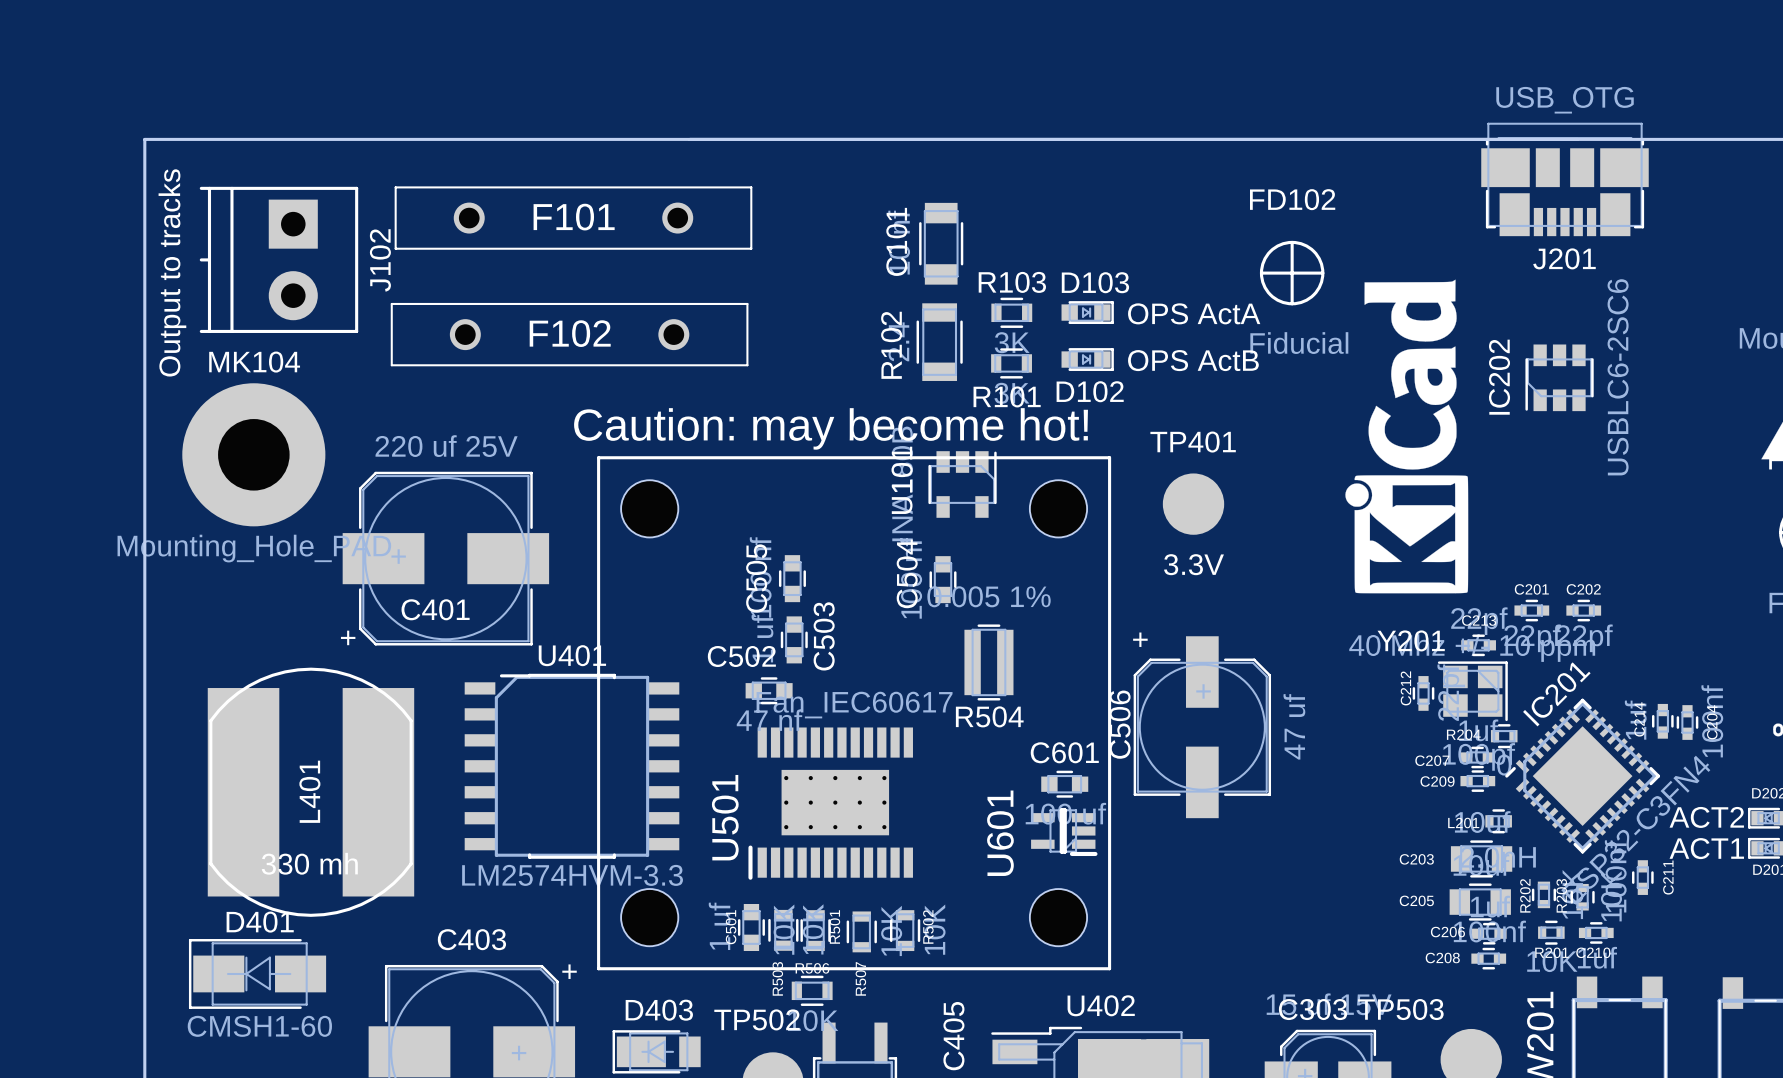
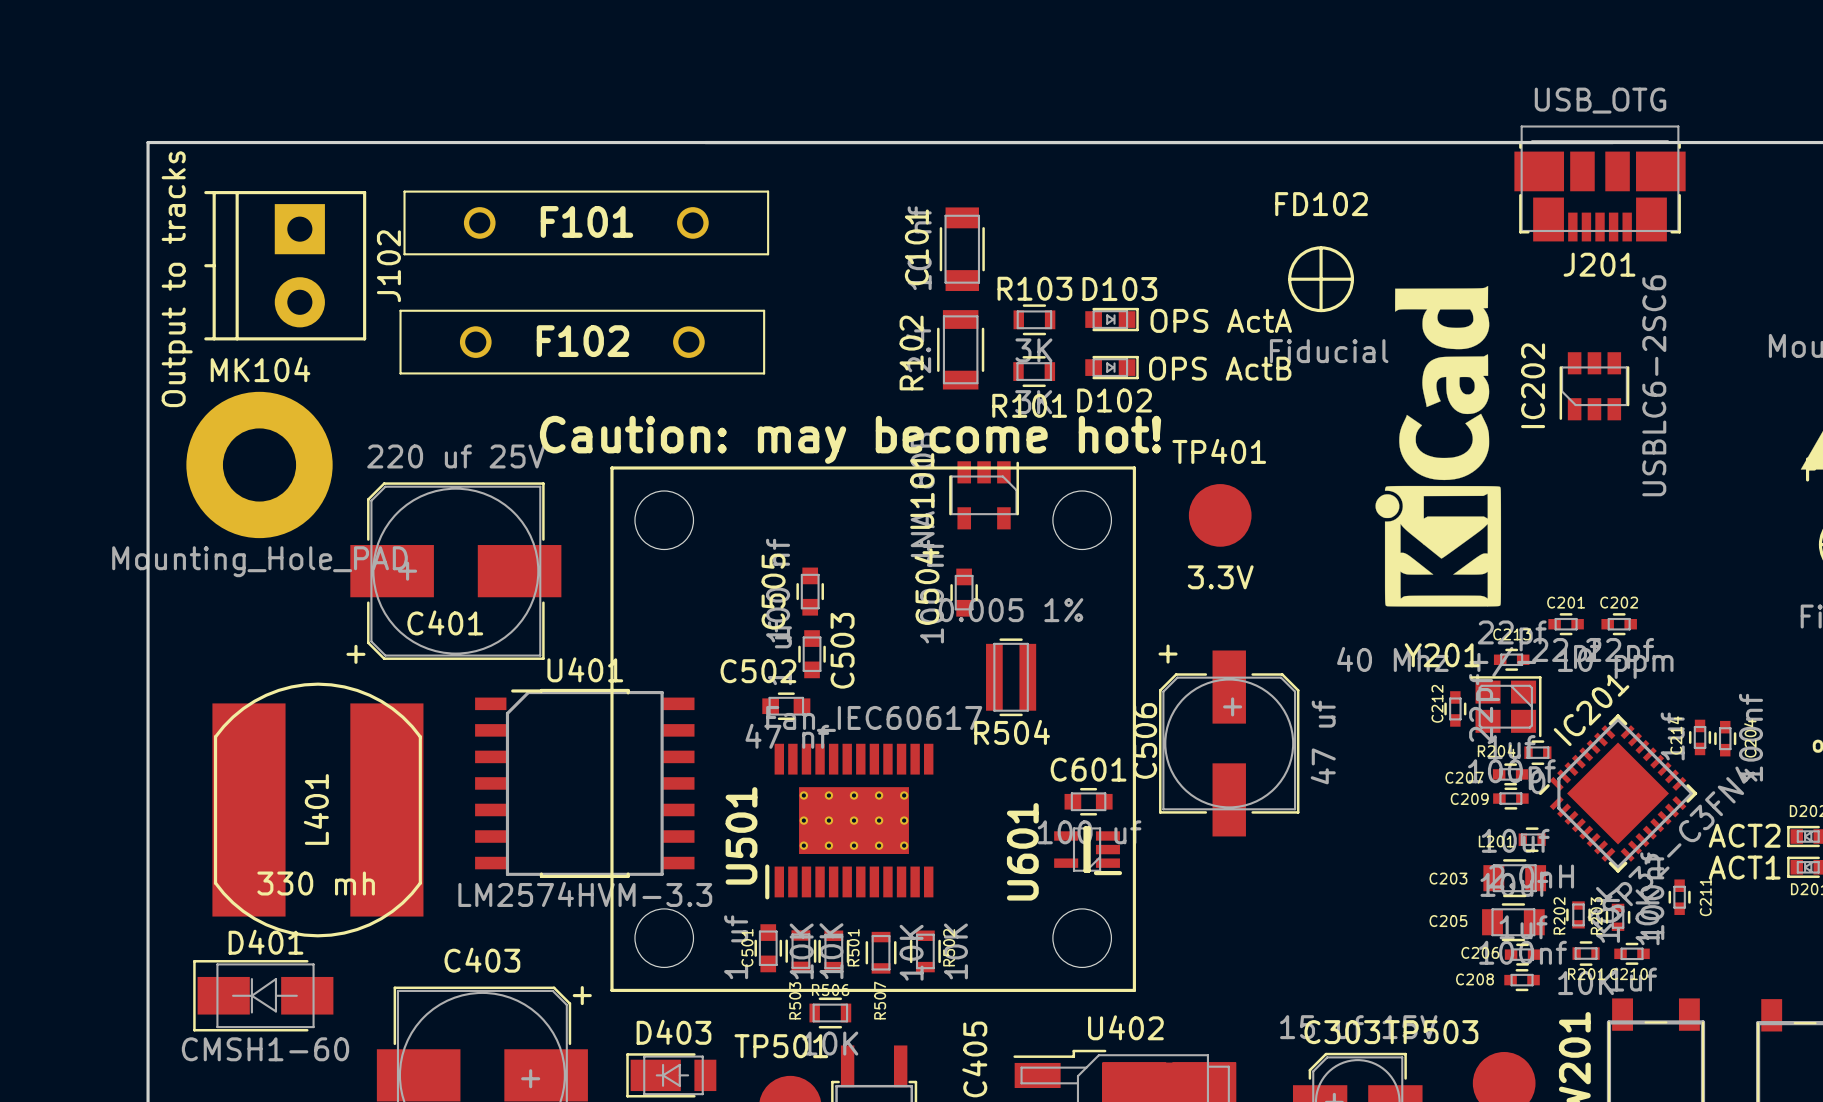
TP502 name: TP502 (757, 1019) -> TP501 (781, 1046)

